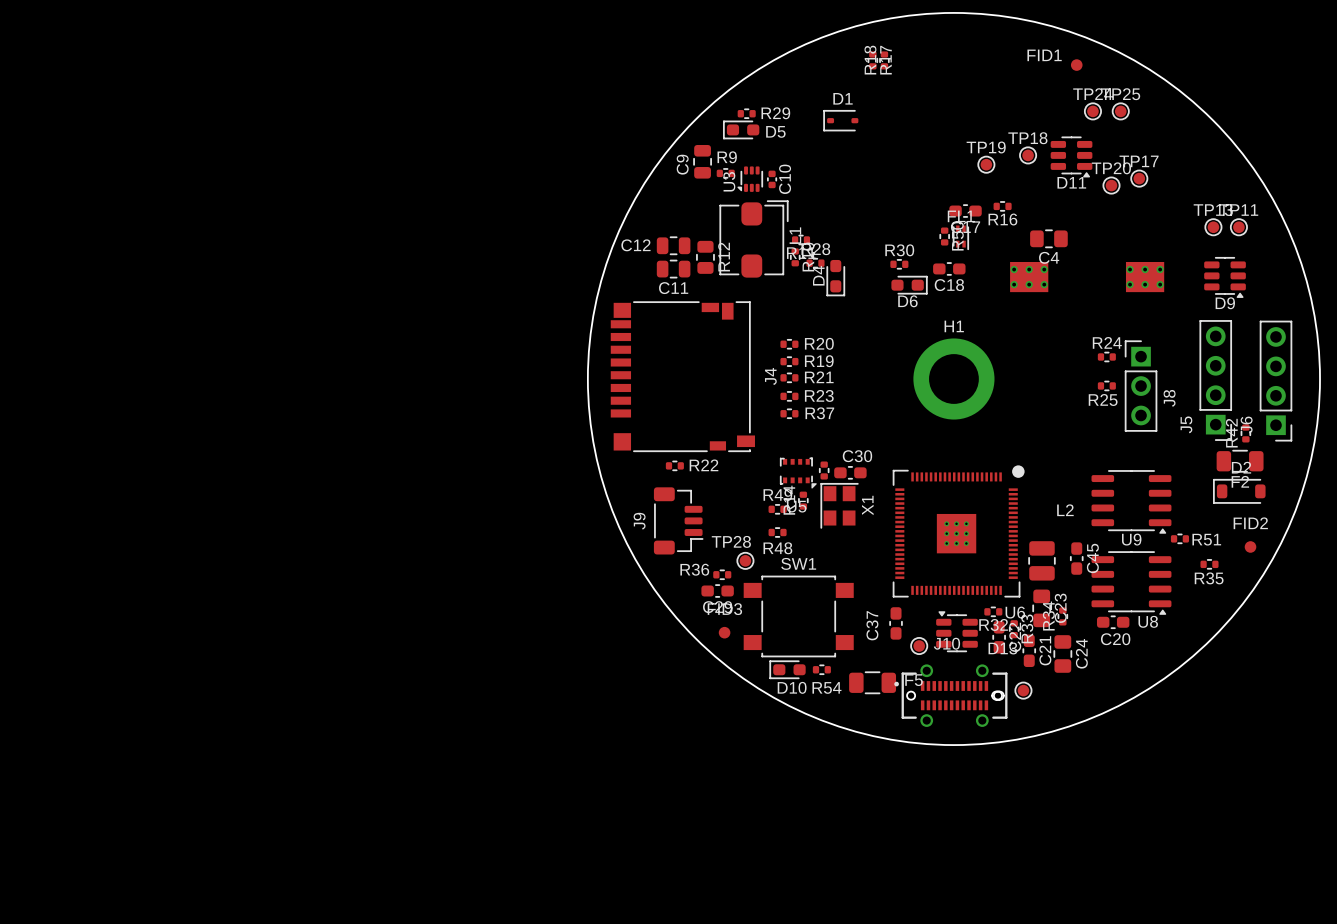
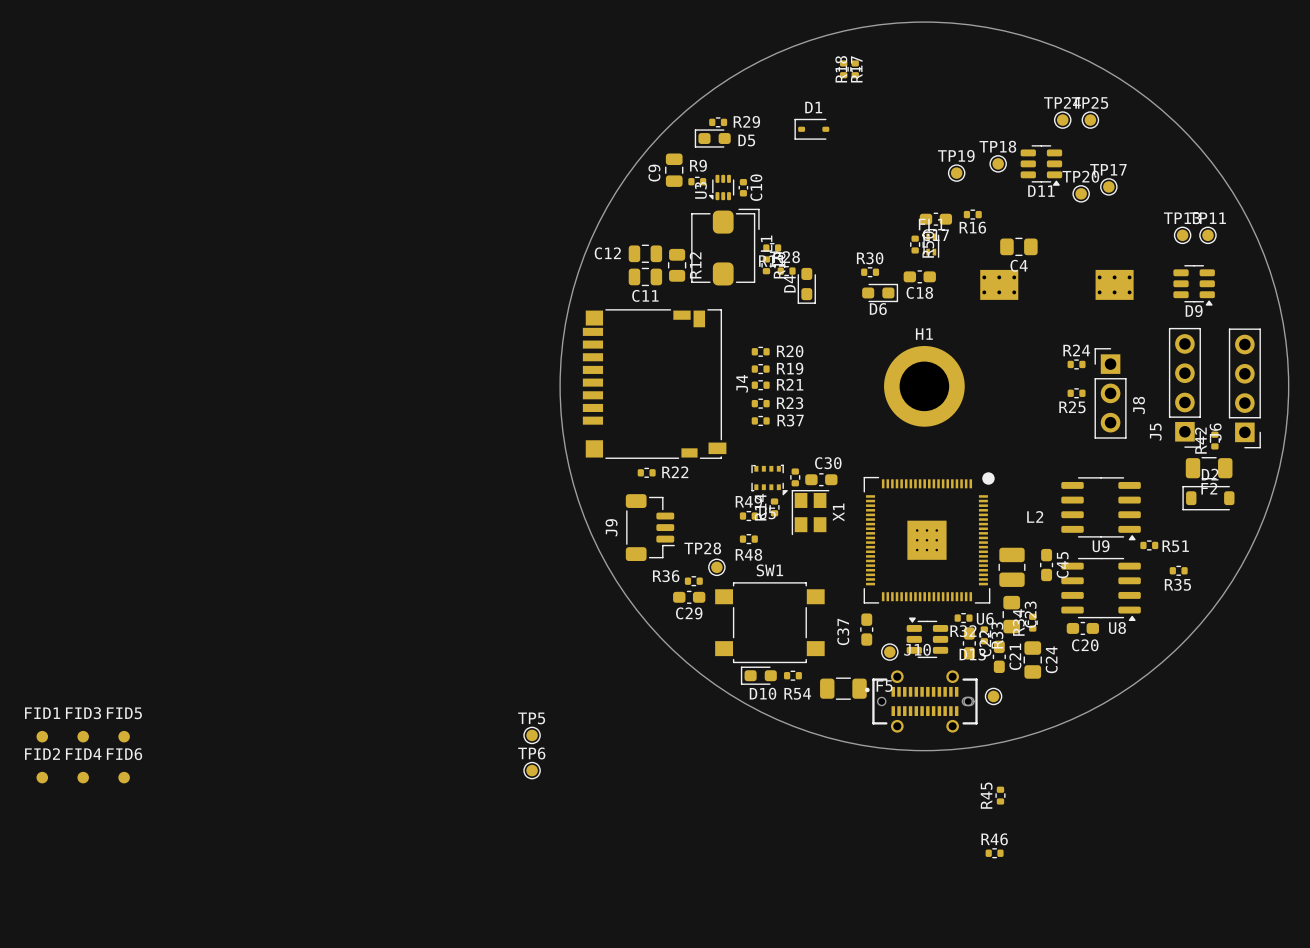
FID1 name position: FID1 (1044, 55) -> FID1 (42, 713)
FID1 position: (1076, 65) -> (42, 736)
FID2 position: (1250, 546) -> (42, 777)
FID3 position: (724, 632) -> (83, 736)
TP5: none -> (532, 735)
FID5: none -> (124, 736)
TP6: none -> (532, 770)
FID4: none -> (83, 777)
FID6: none -> (124, 777)
R45: none -> (1000, 795)
R46: none -> (994, 853)

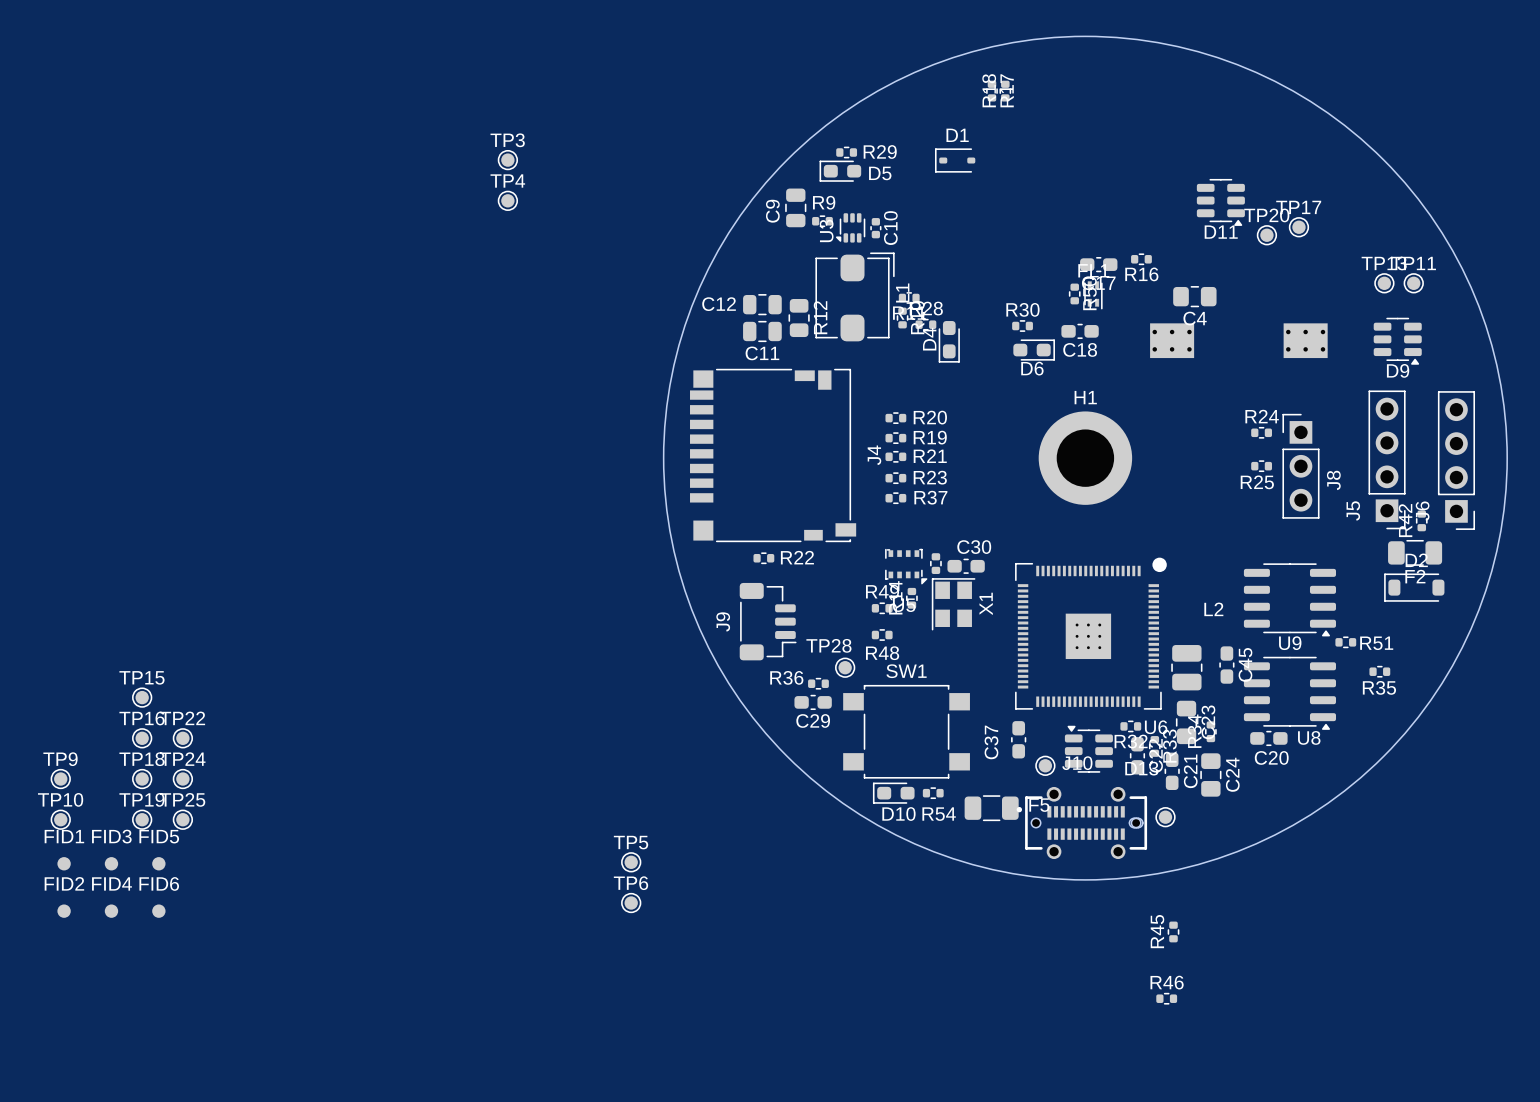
TP24 position: (1062, 120) -> (182, 779)
TP25 position: (1090, 120) -> (182, 819)
TP3: none -> (507, 160)
TP18 position: (998, 163) -> (142, 779)
TP4: none -> (507, 200)
TP19 position: (956, 173) -> (142, 819)
TP15: none -> (142, 697)
TP16: none -> (142, 738)
TP22: none -> (182, 738)
TP9: none -> (60, 779)
TP10: none -> (60, 819)

